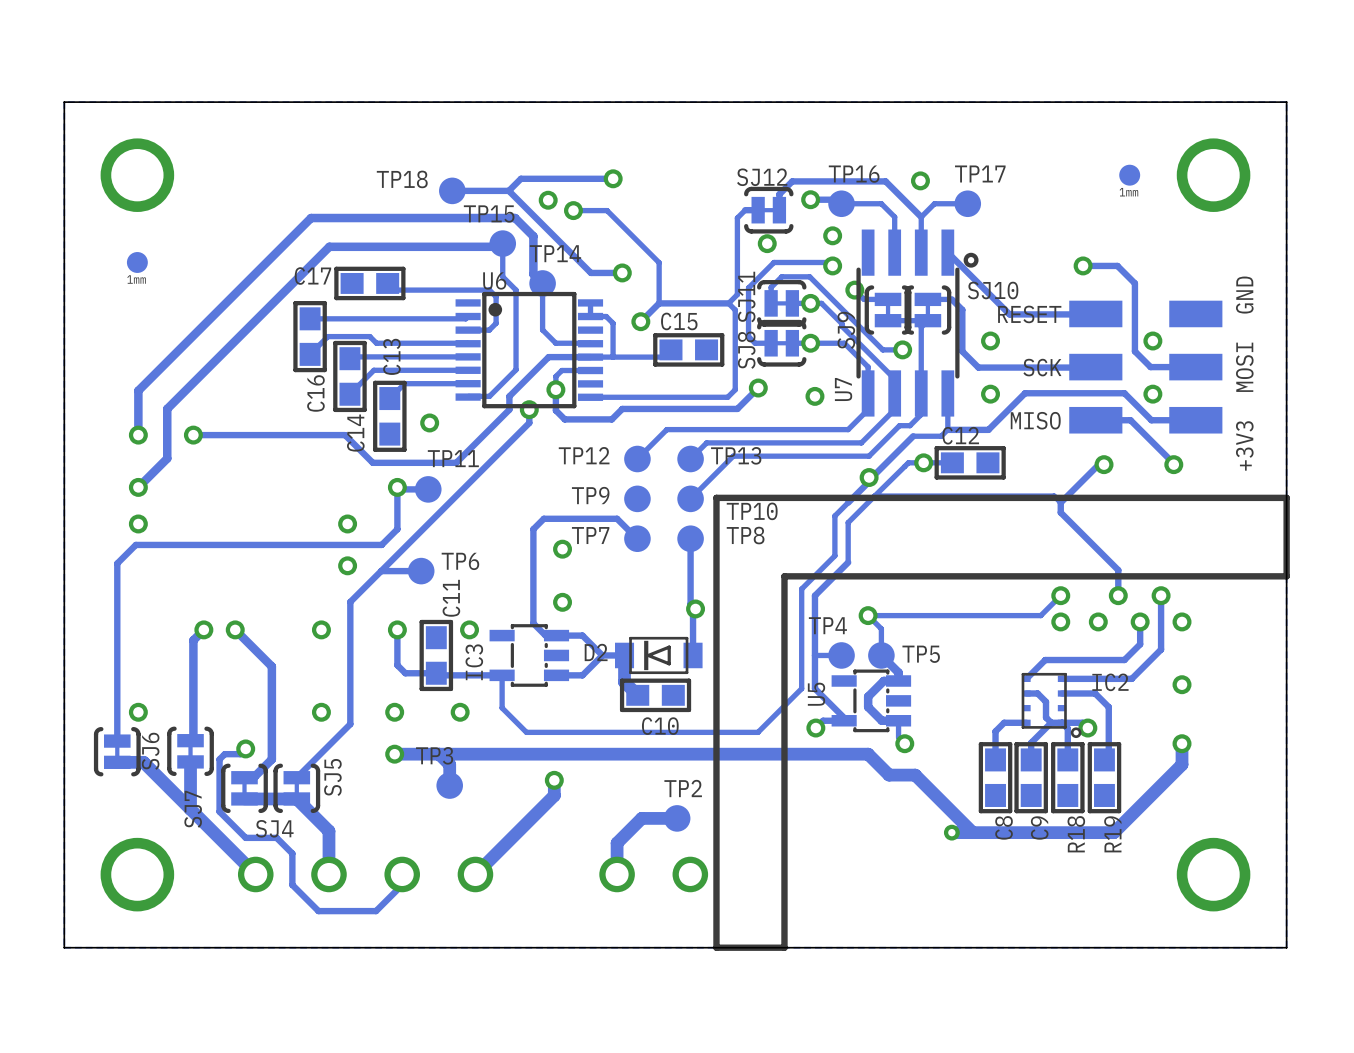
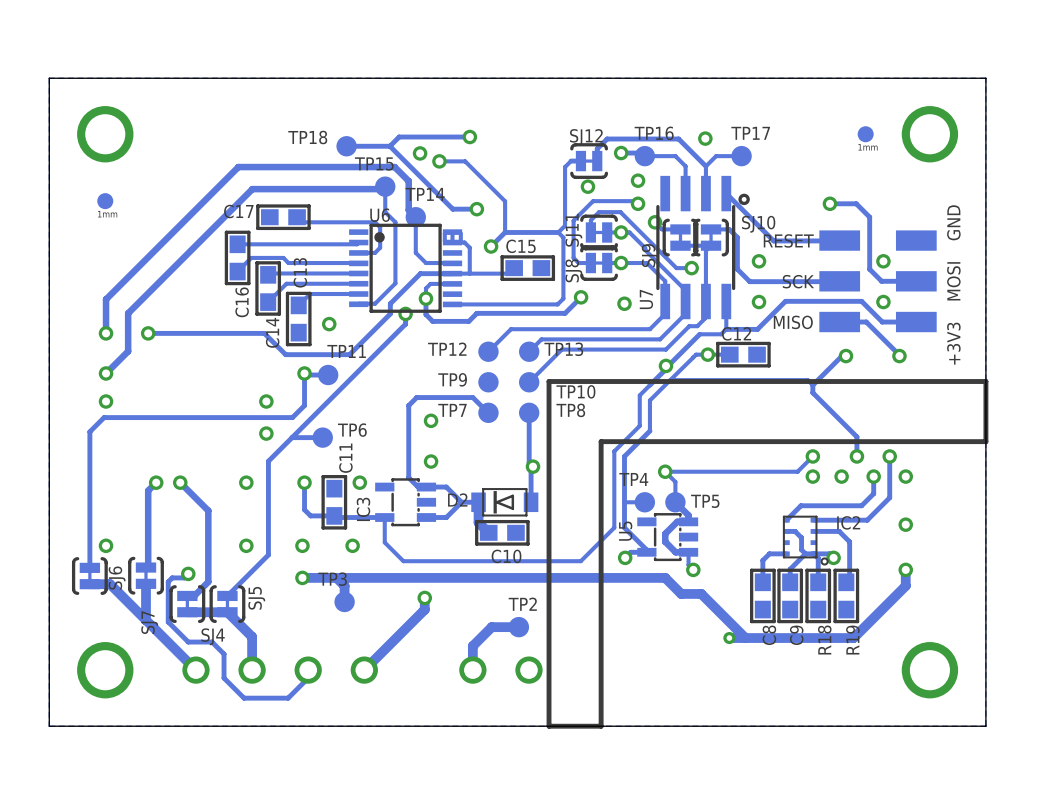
track: none -> (444, 233) (444, 241)
track: none -> (460, 233) (460, 241)

